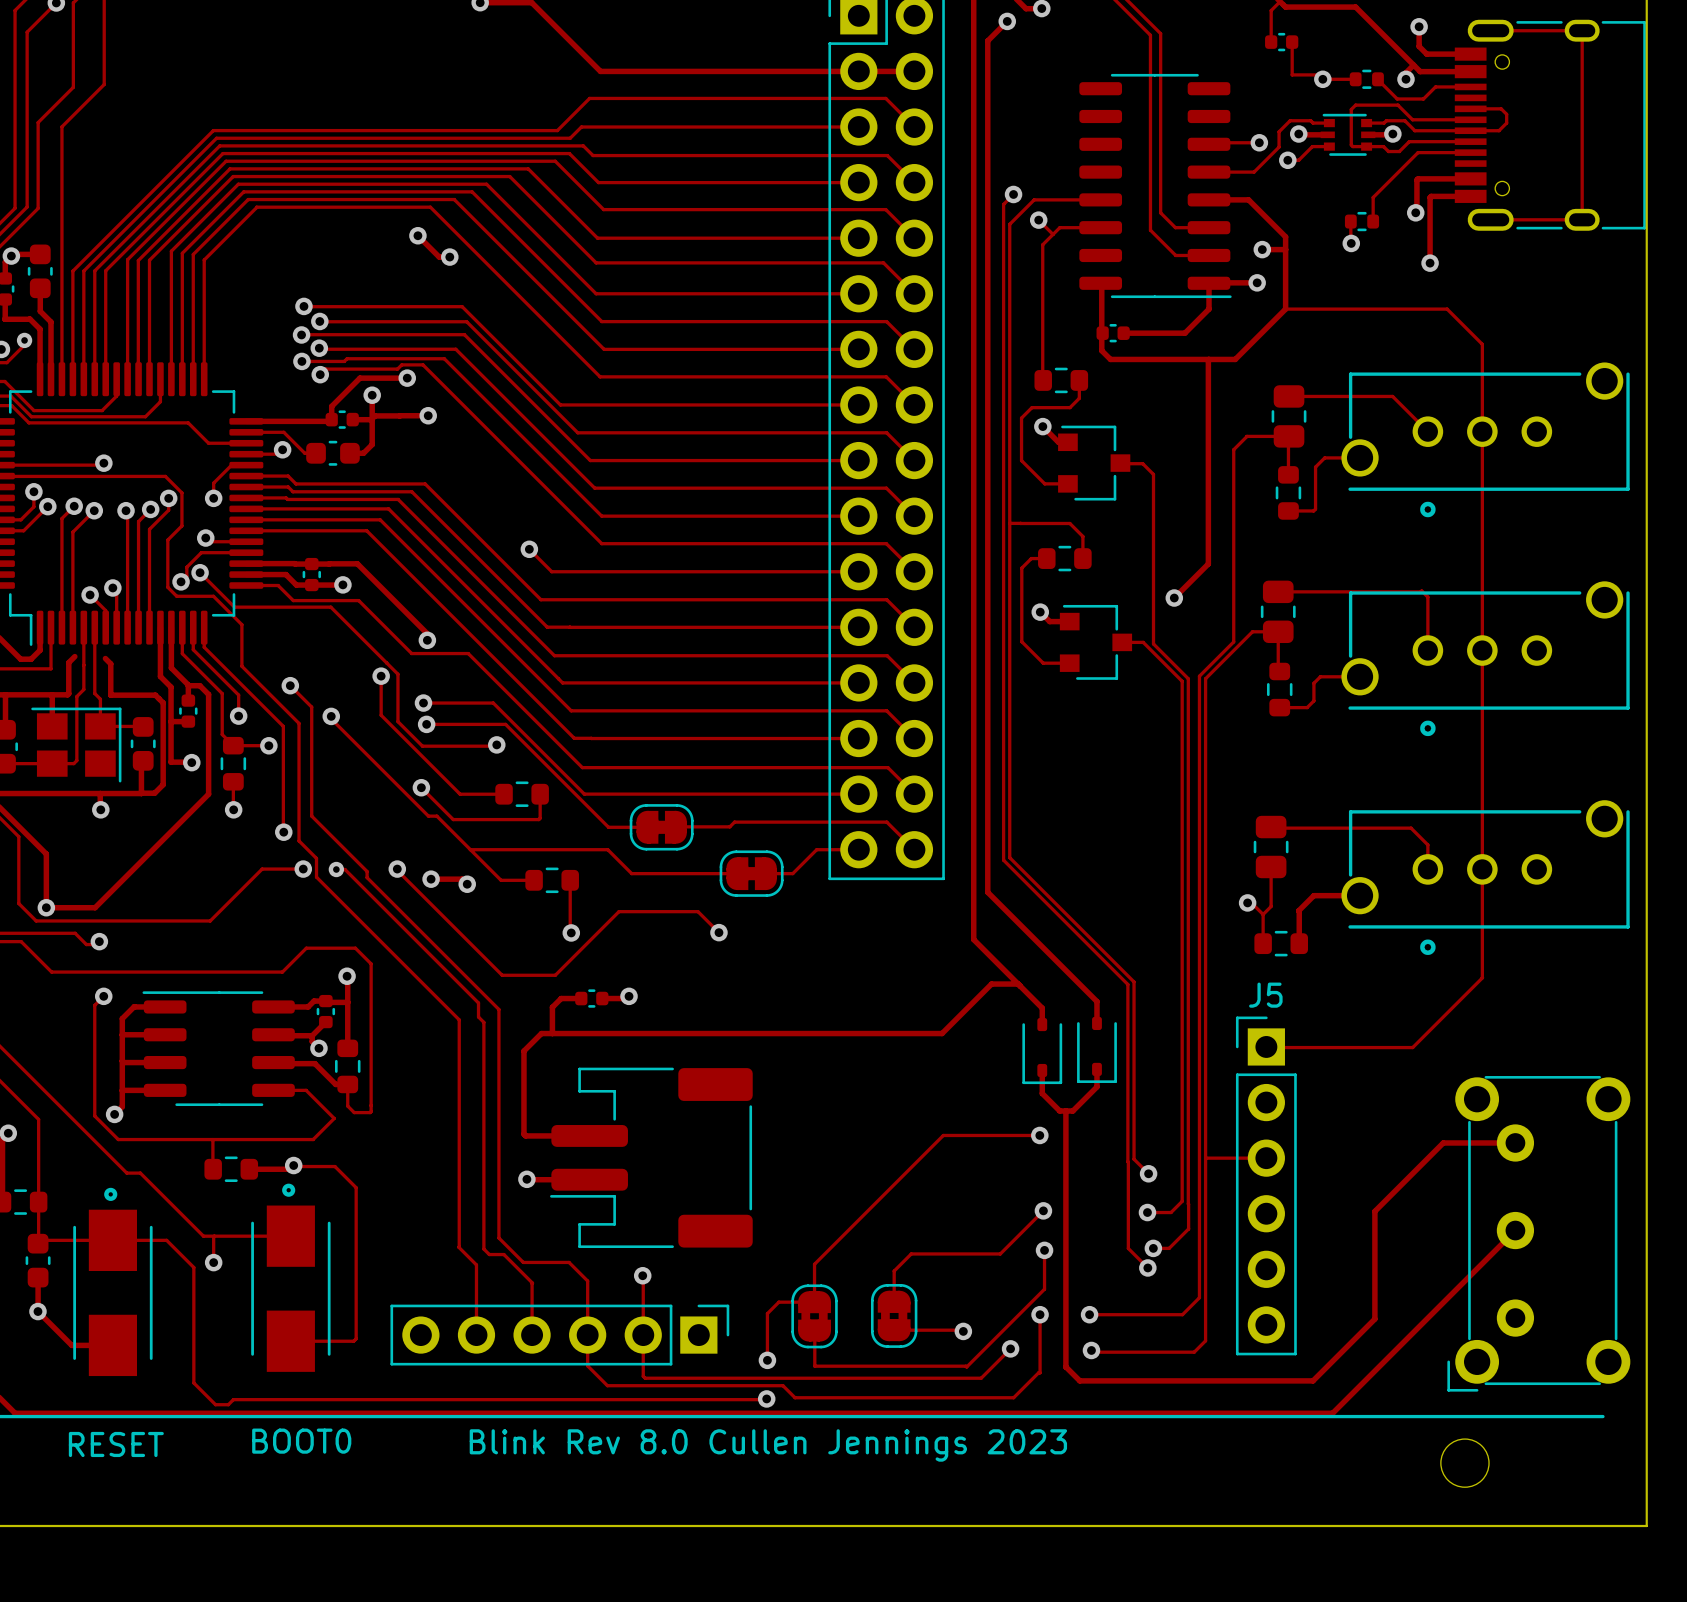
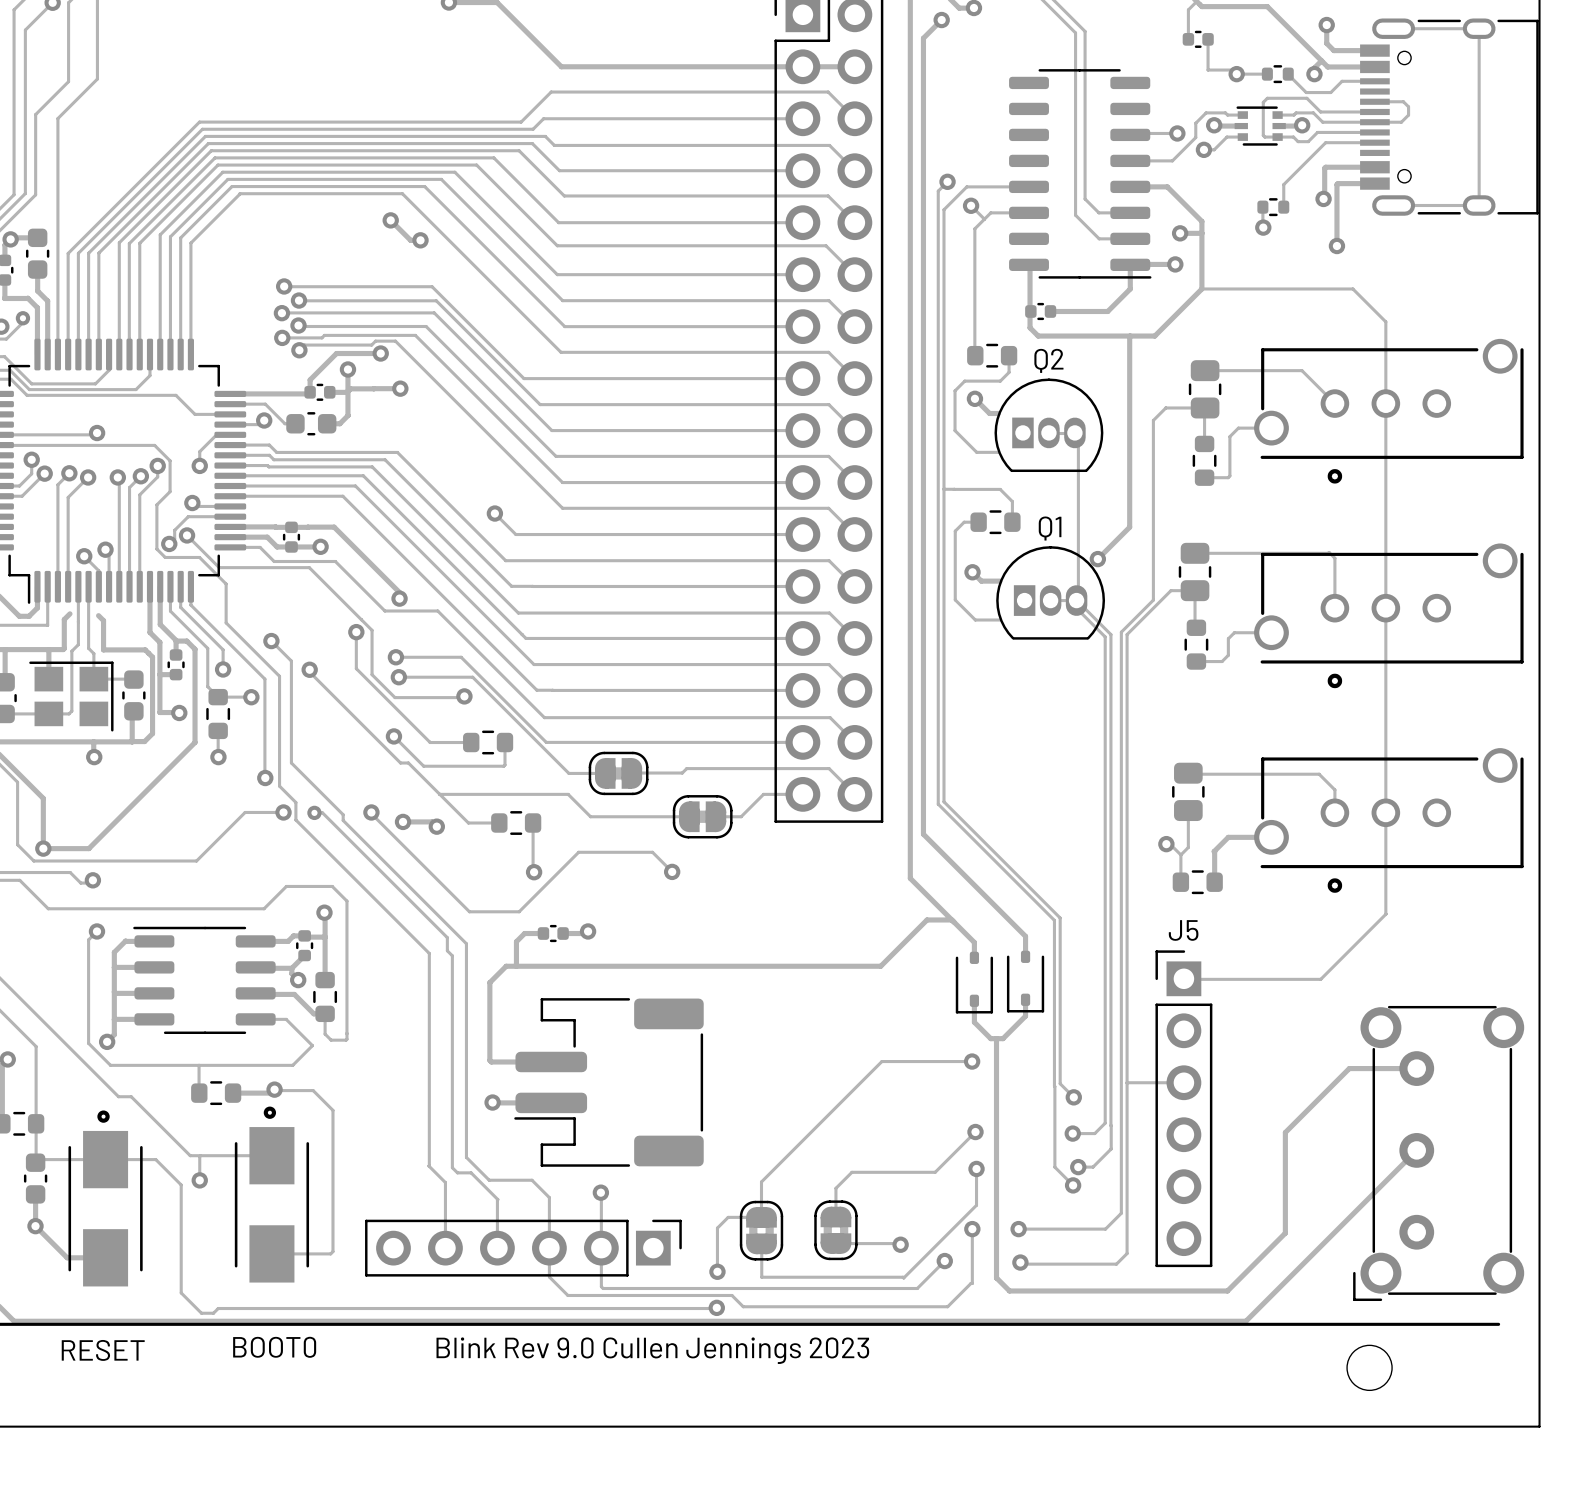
Q2: none -> (1048, 425)
part: (1094, 463) -> none
Q1: none -> (1050, 592)
part: (1095, 642) -> none
text: Blink Rev 8.0 Cullen Jennings 2023 (768, 1445) -> Blink Rev 9.0 Cullen Jennings 2023 (652, 1350)

